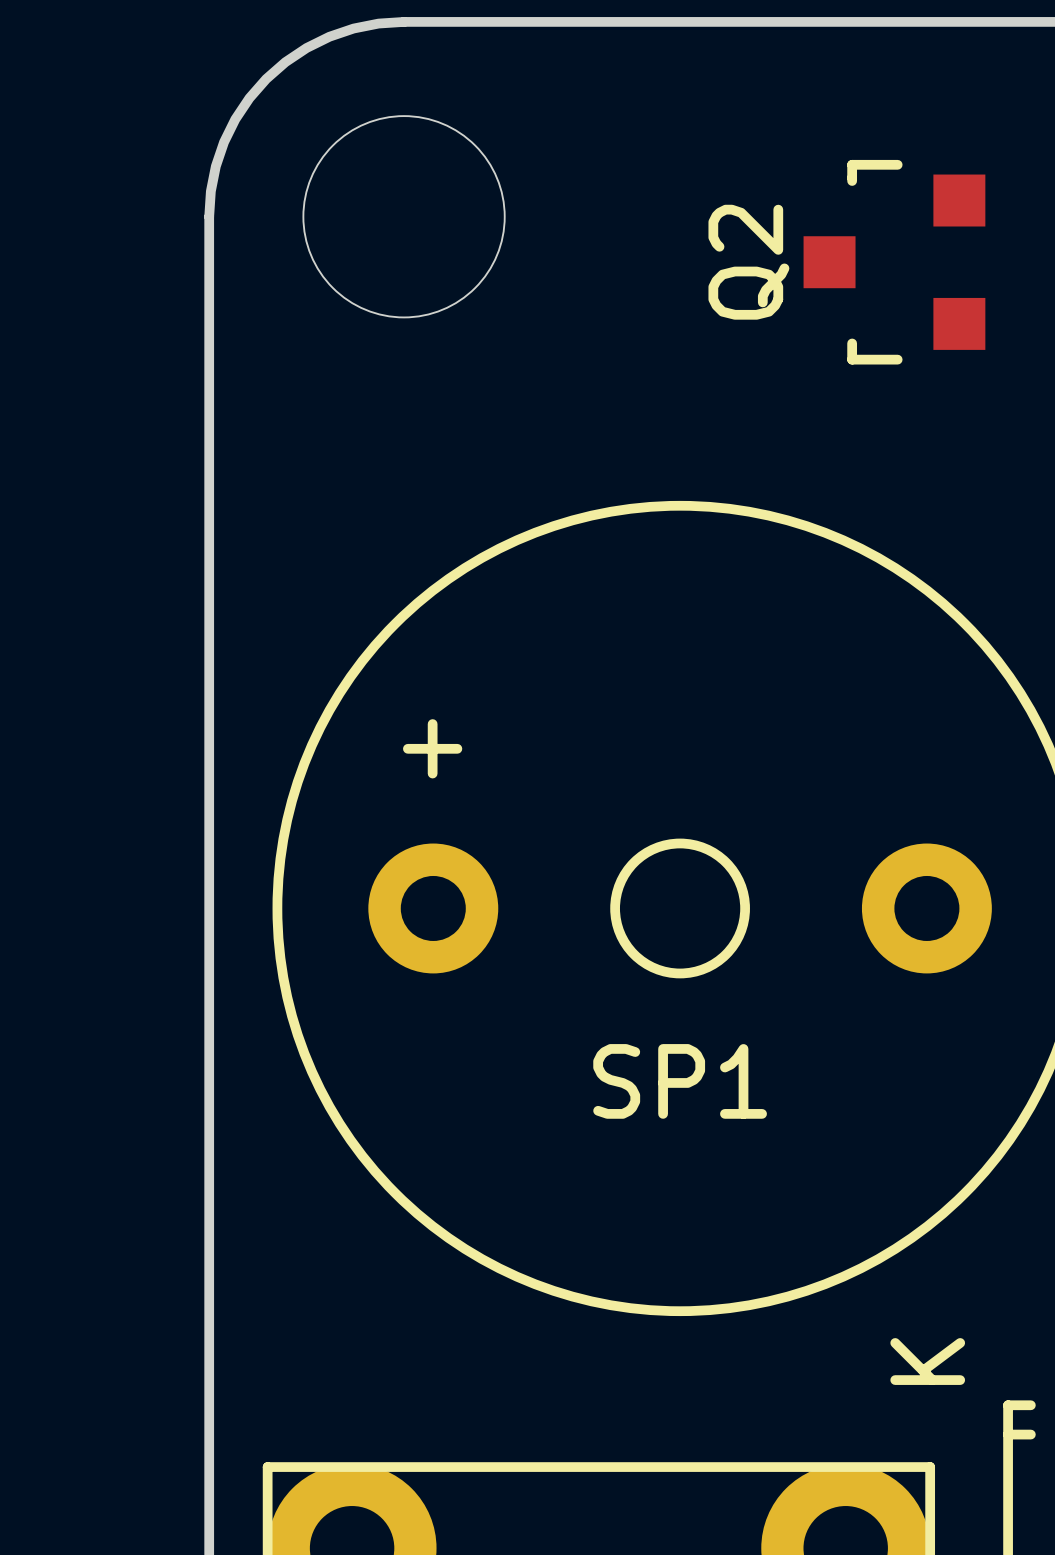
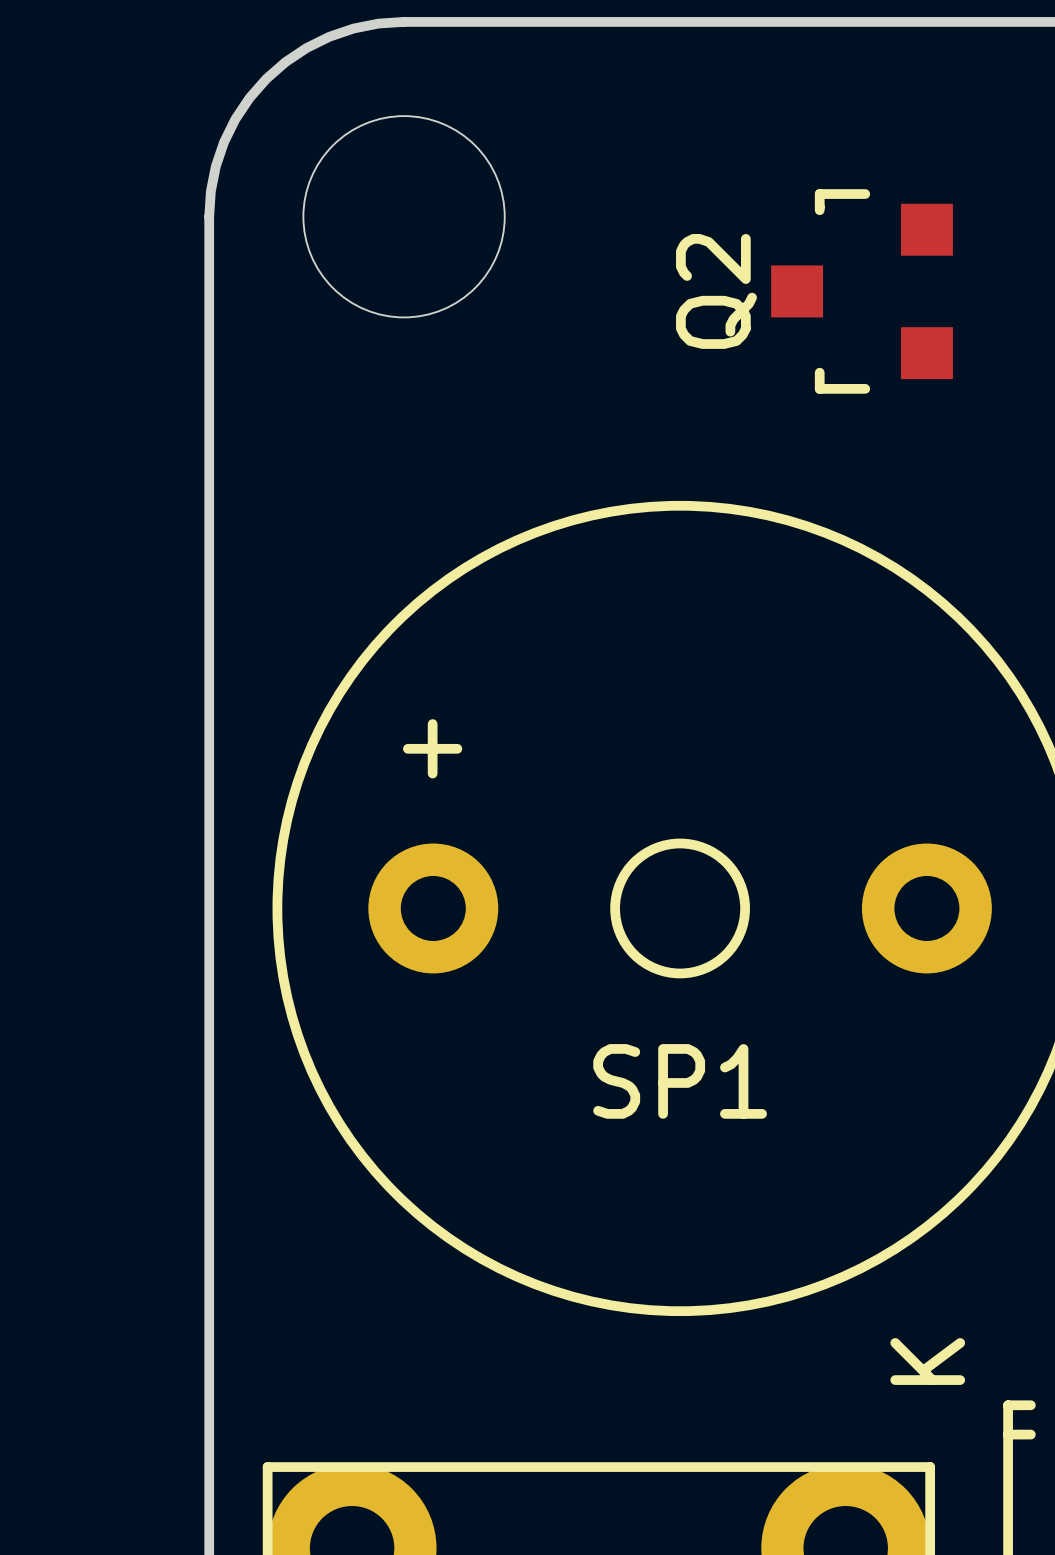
Q2 position: (894, 262) -> (862, 291)

